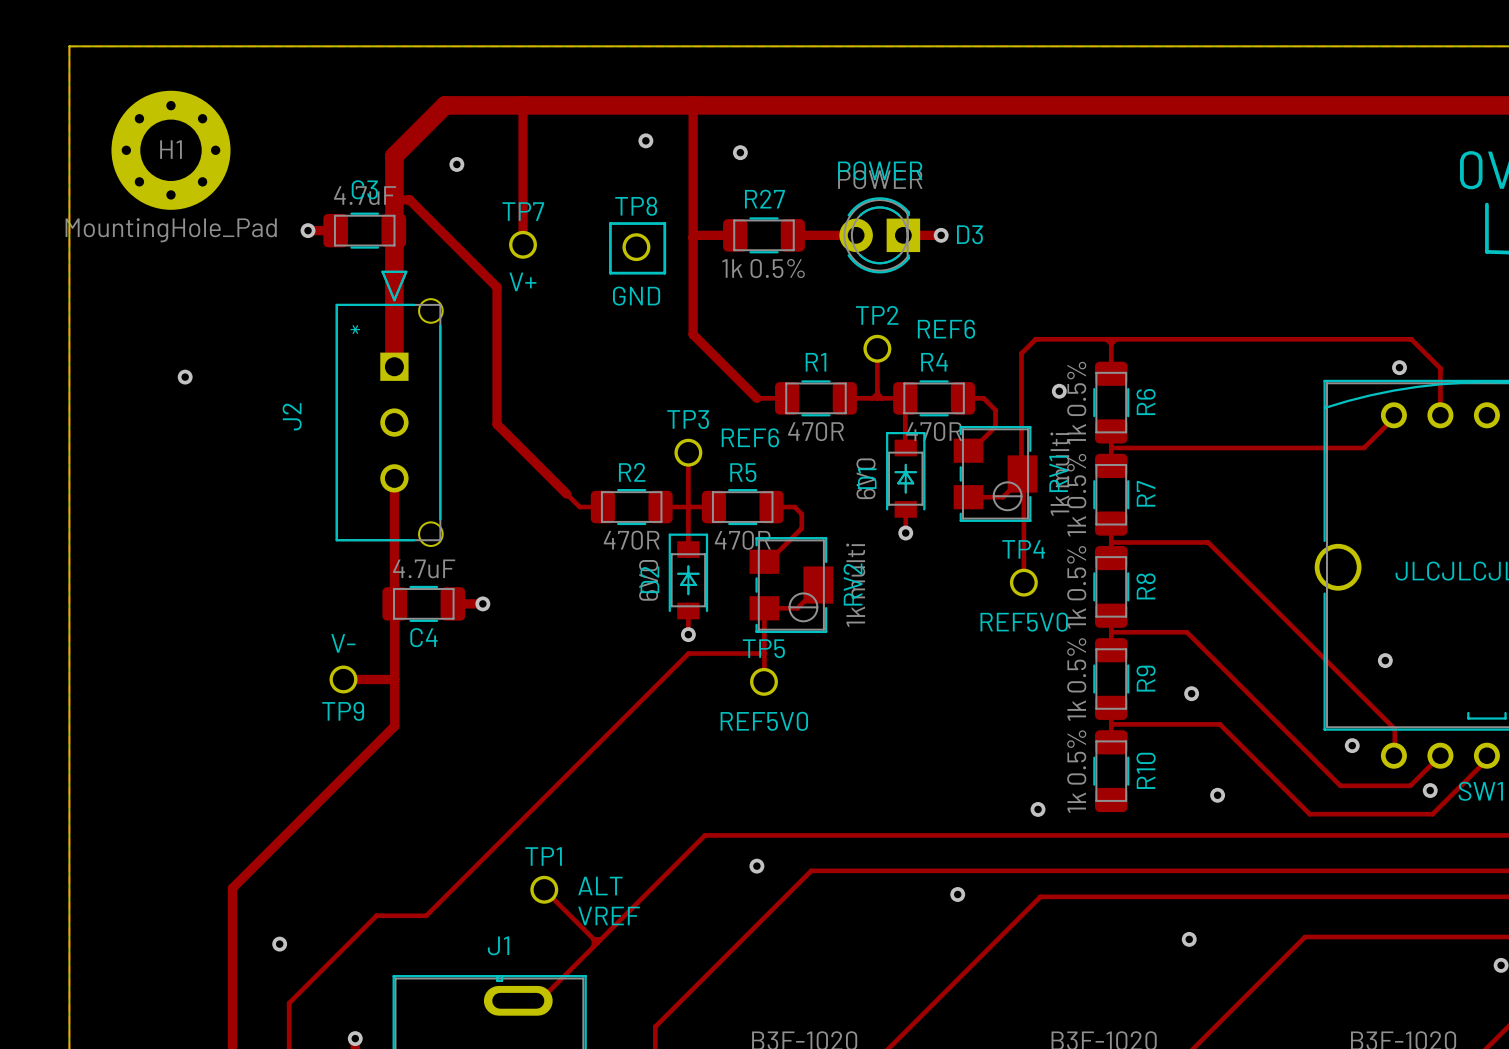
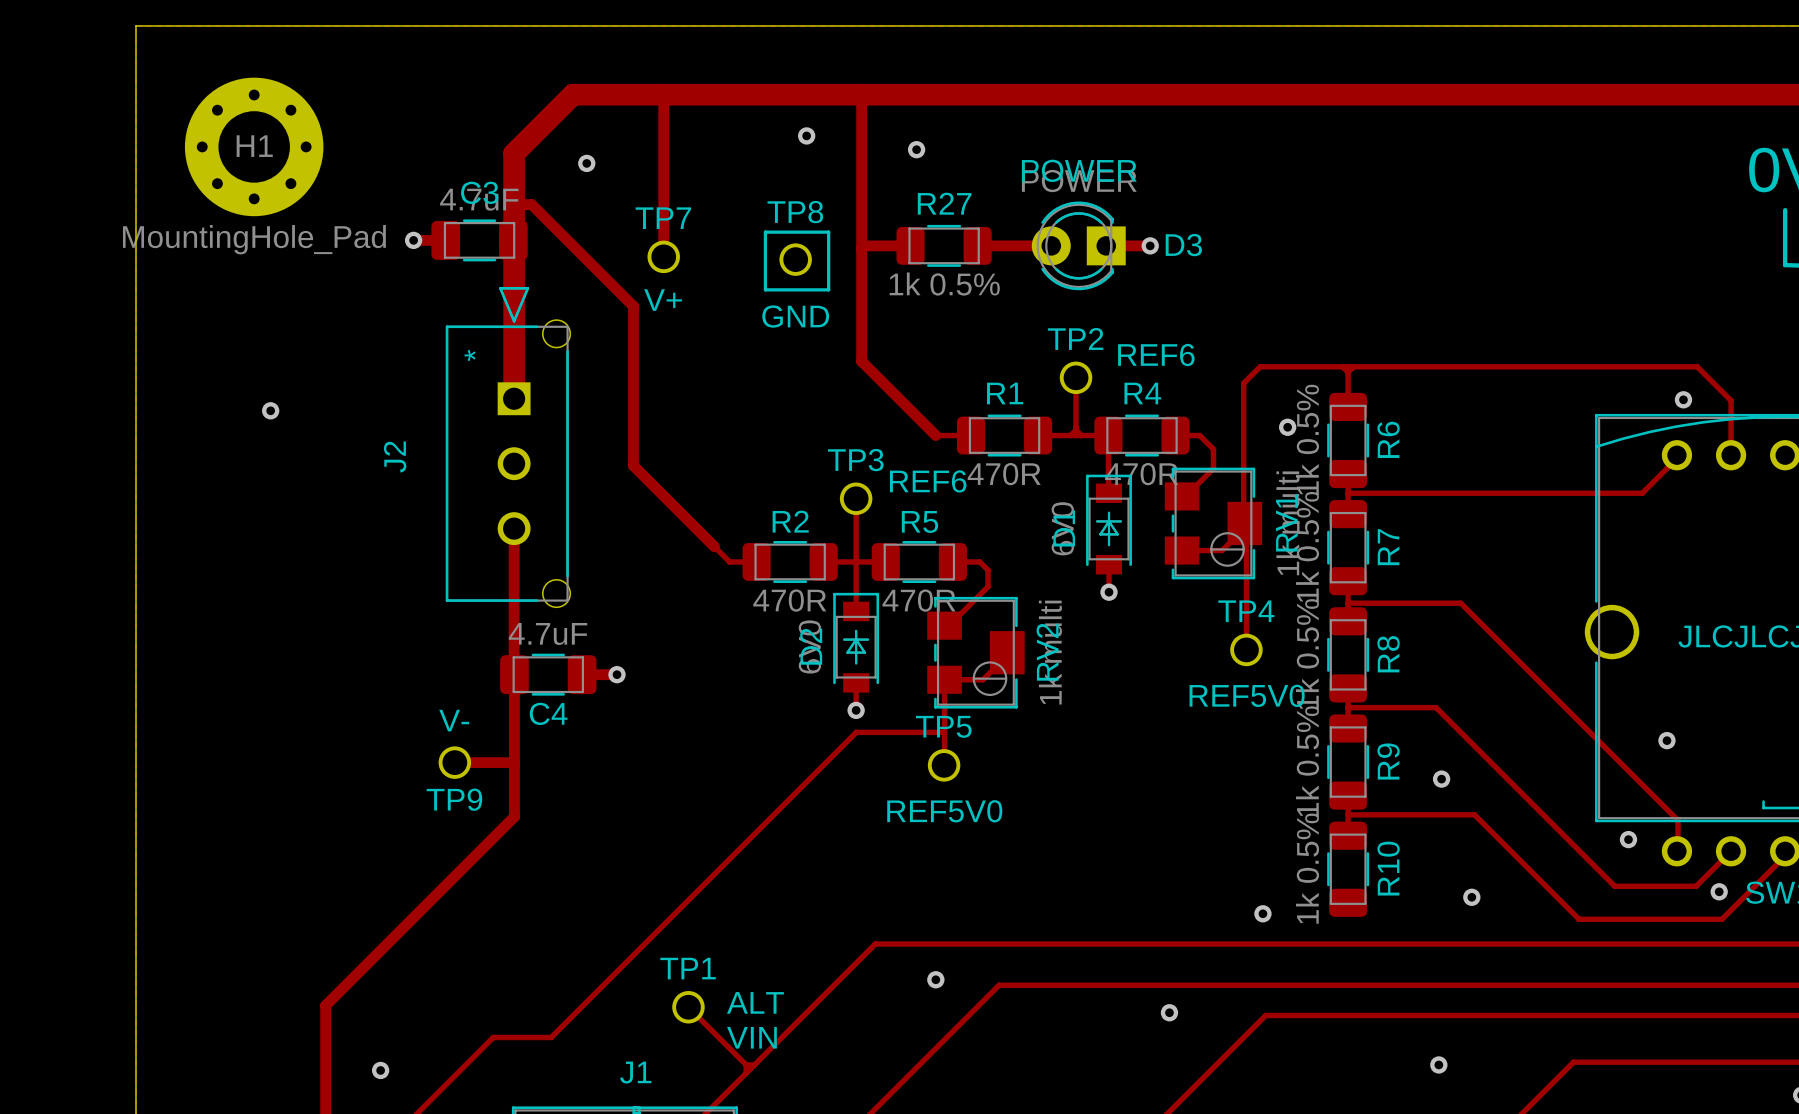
text: VREF (609, 915) -> VIN (751, 1037)

